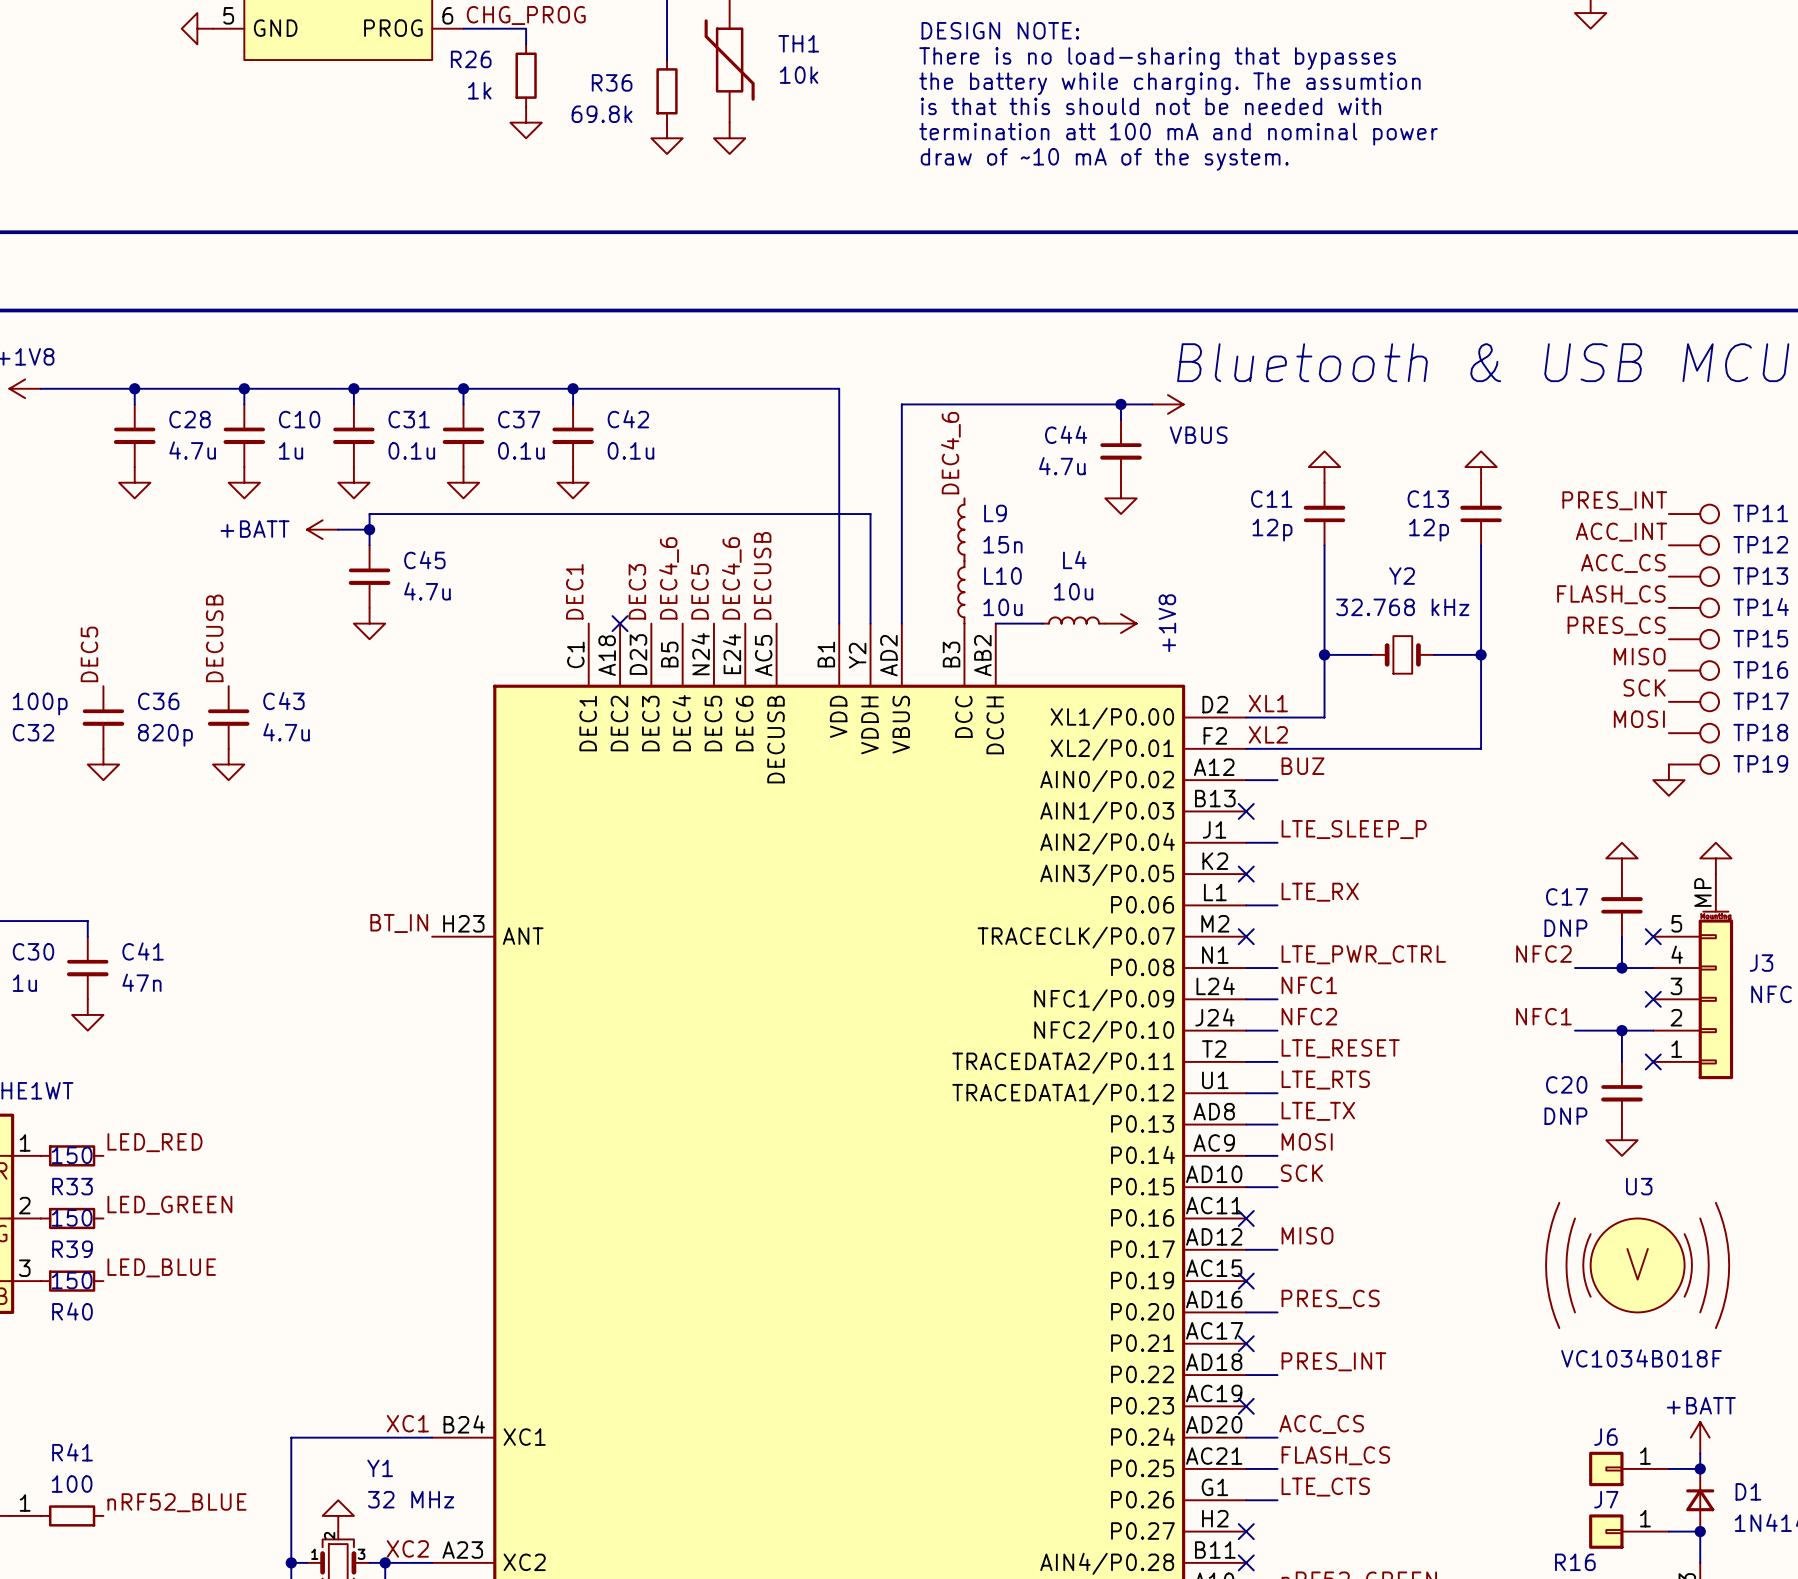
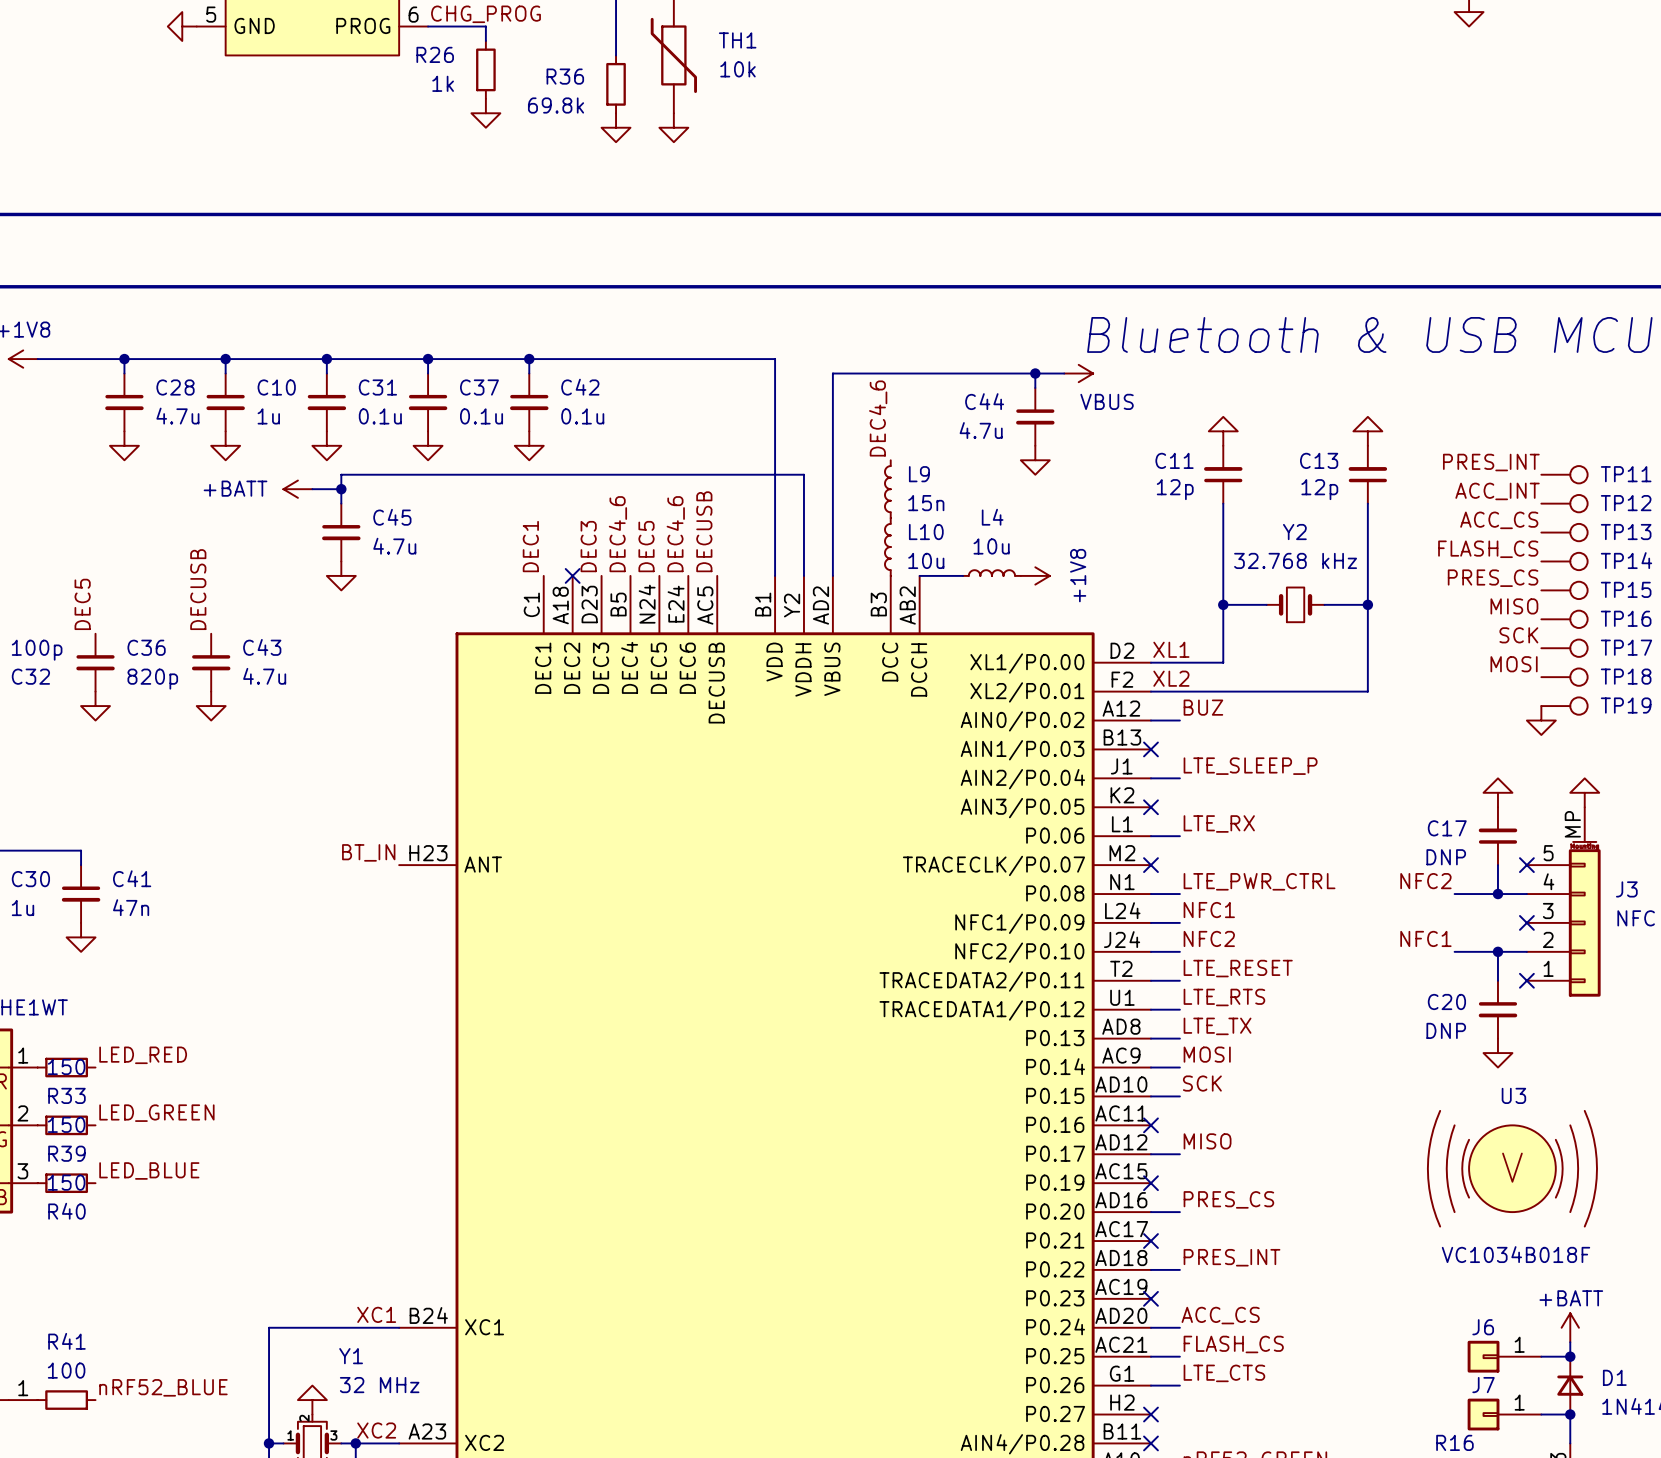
text: DESIGN NOTE: (1000, 30) -> none
text: There is no load-sharing that bypasses (1157, 58) -> none
text: the battery while charging. The assumtion (1169, 83) -> none
text: is that this should not be needed with (1150, 106) -> none
text: termination att 100 mA and nominal power (1178, 134) -> none
text: draw of ~10 mA of the system. (1104, 159) -> none

